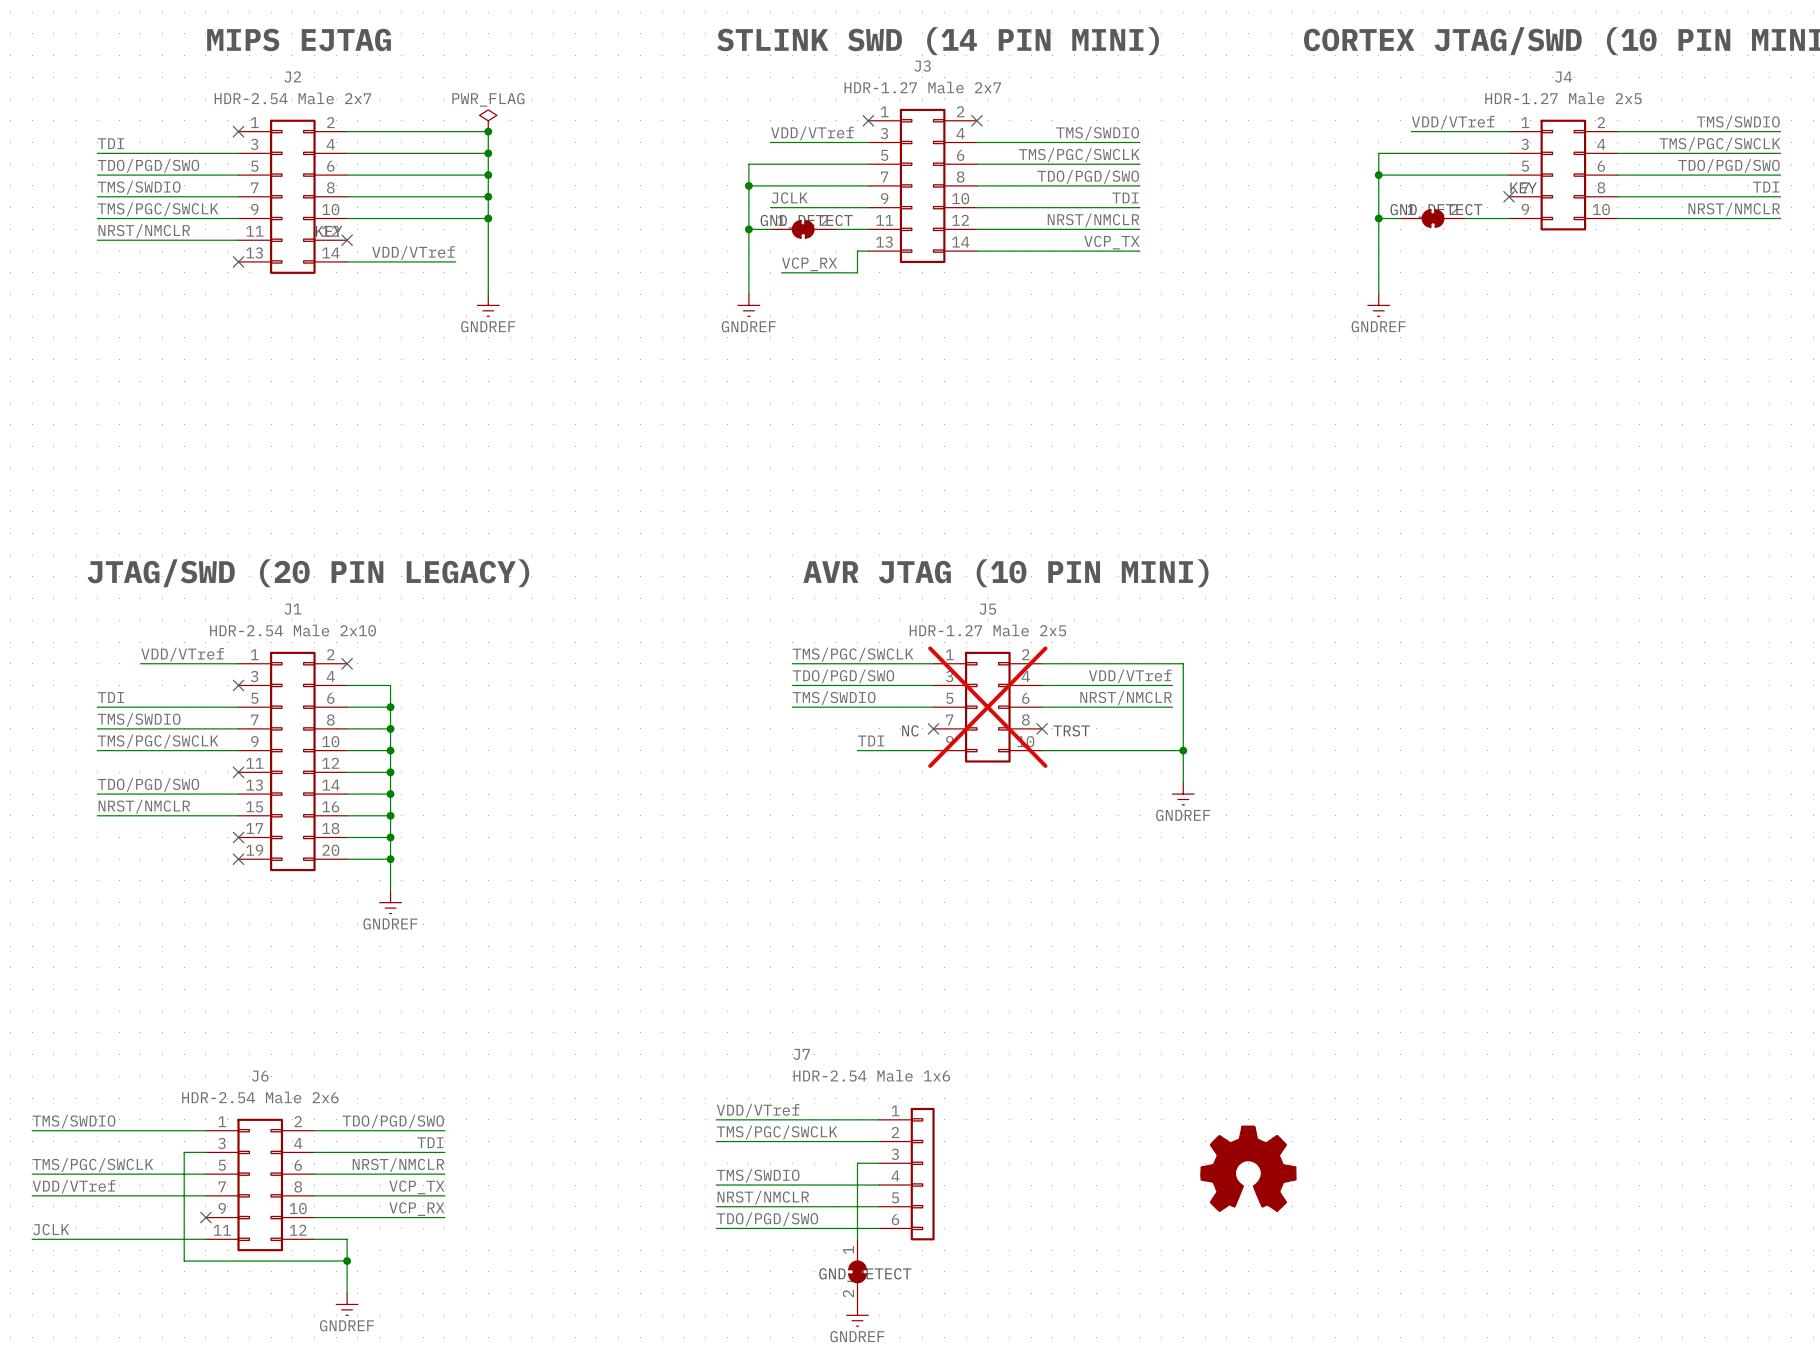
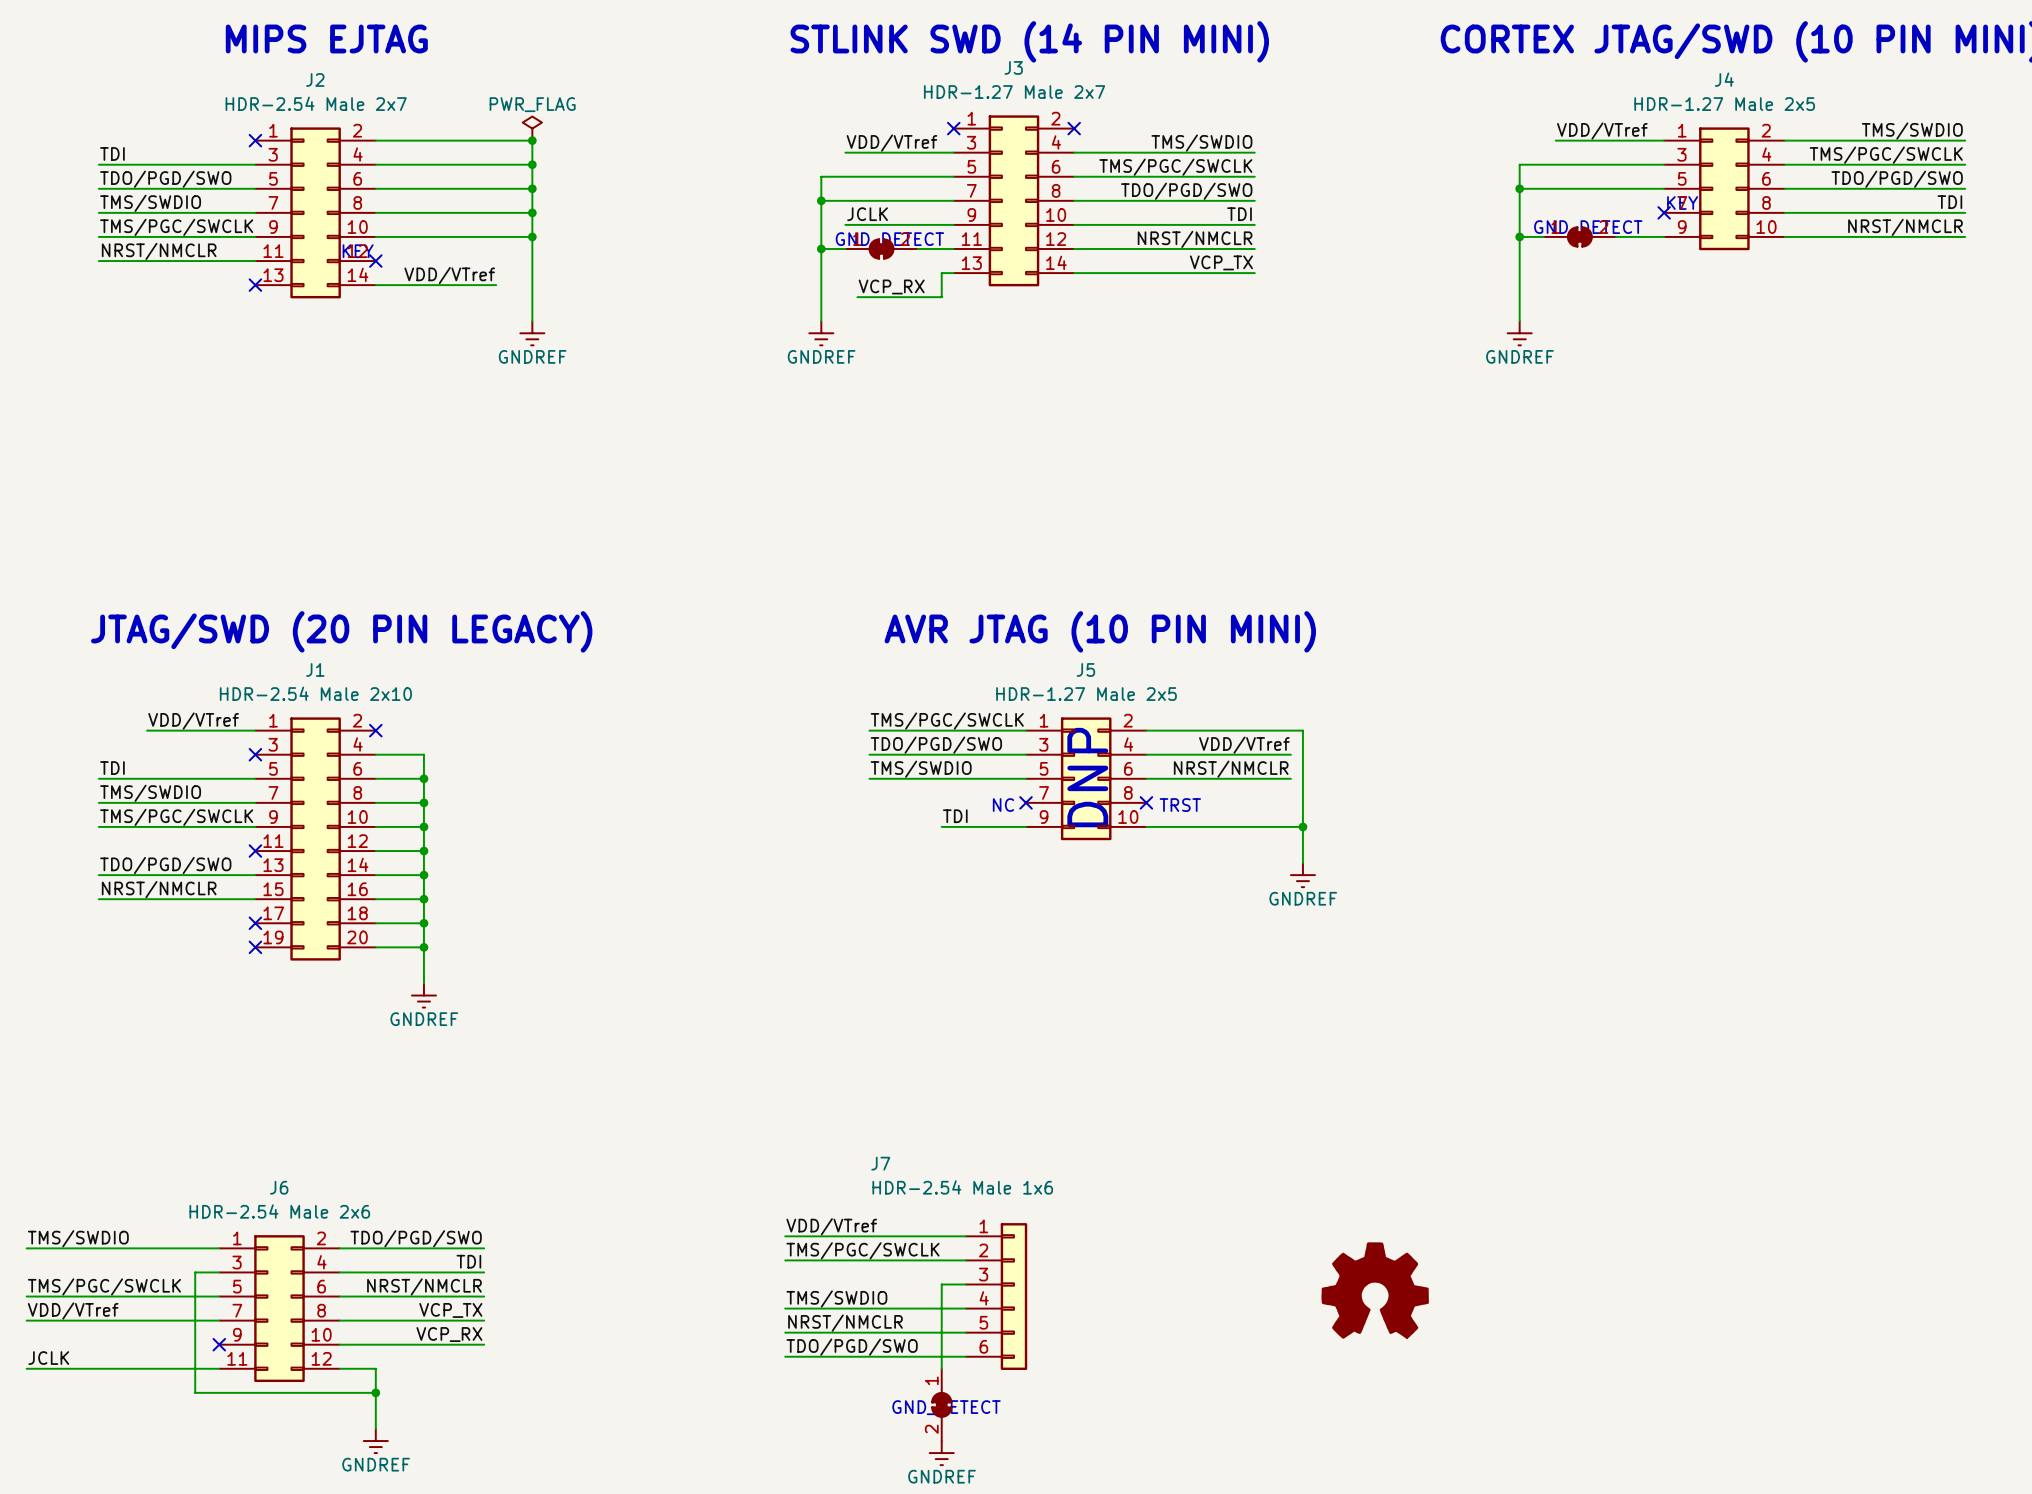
J5 do-not-place cross: (987, 707) -> none
text: none -> DNP (1087, 777)

